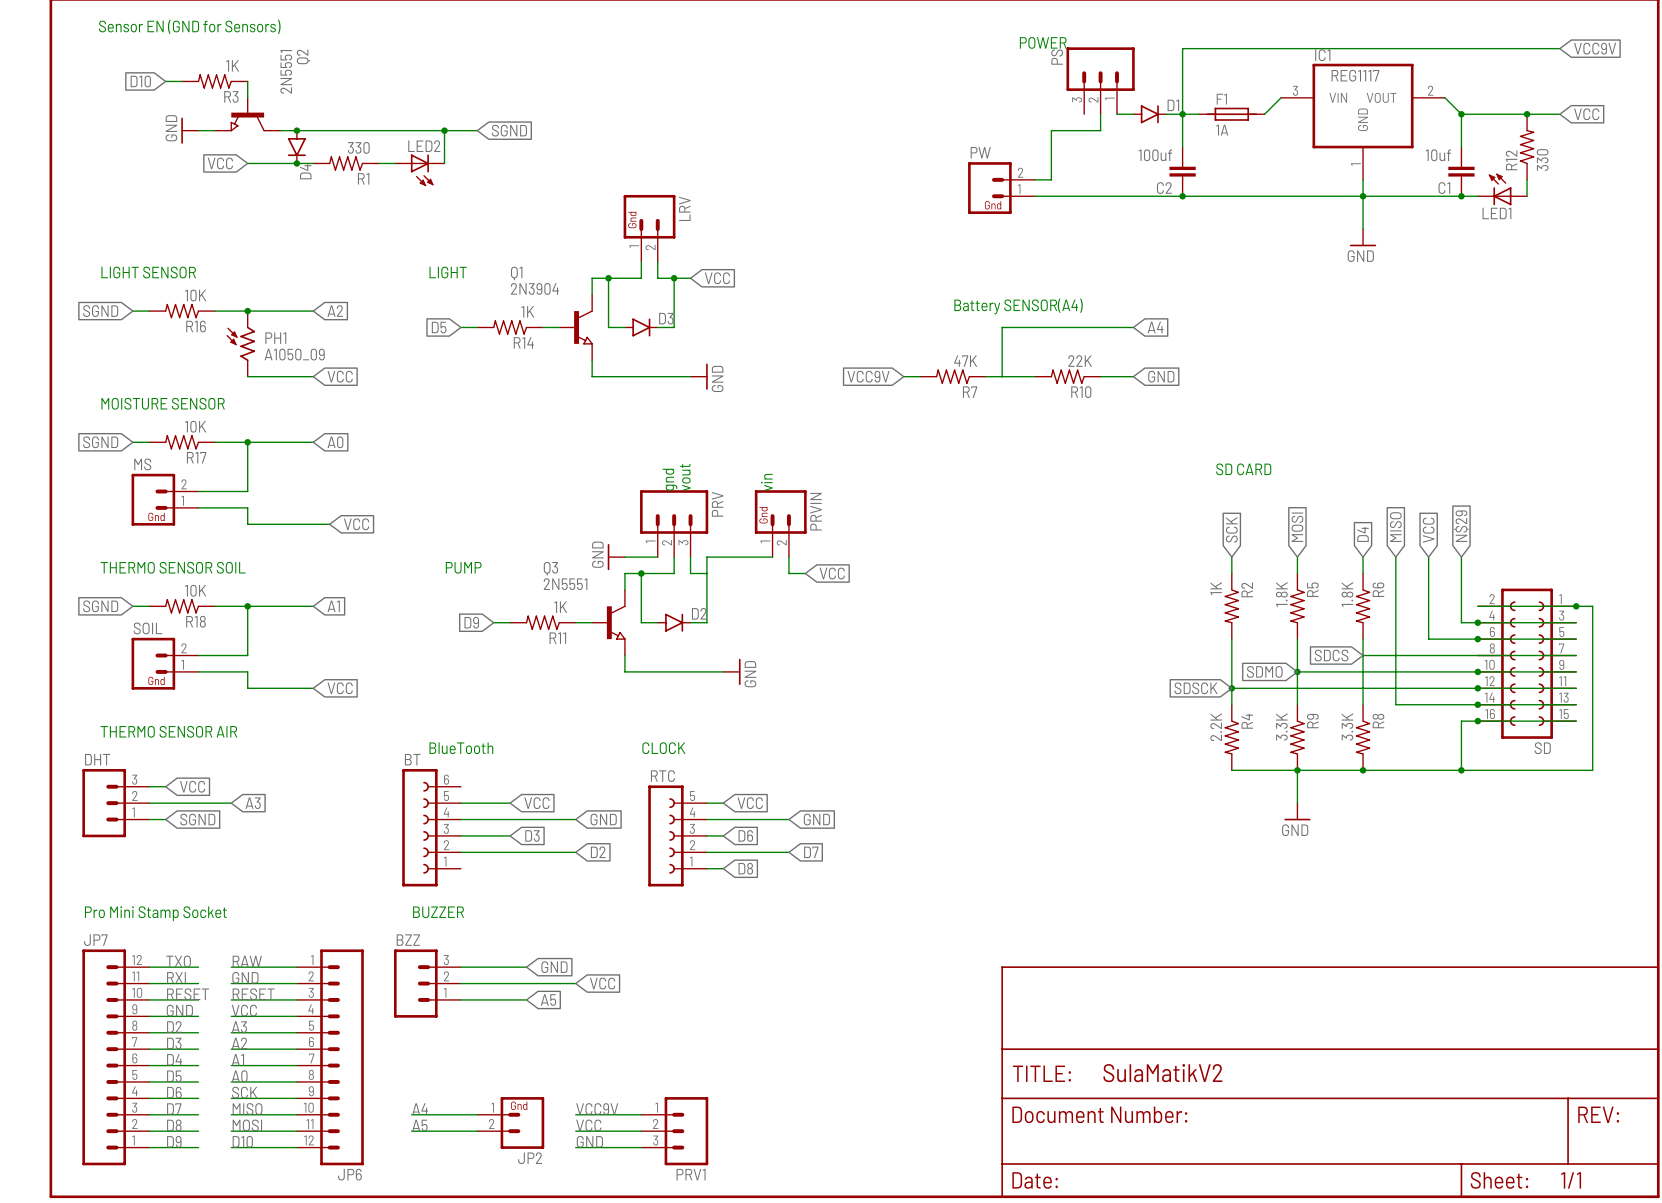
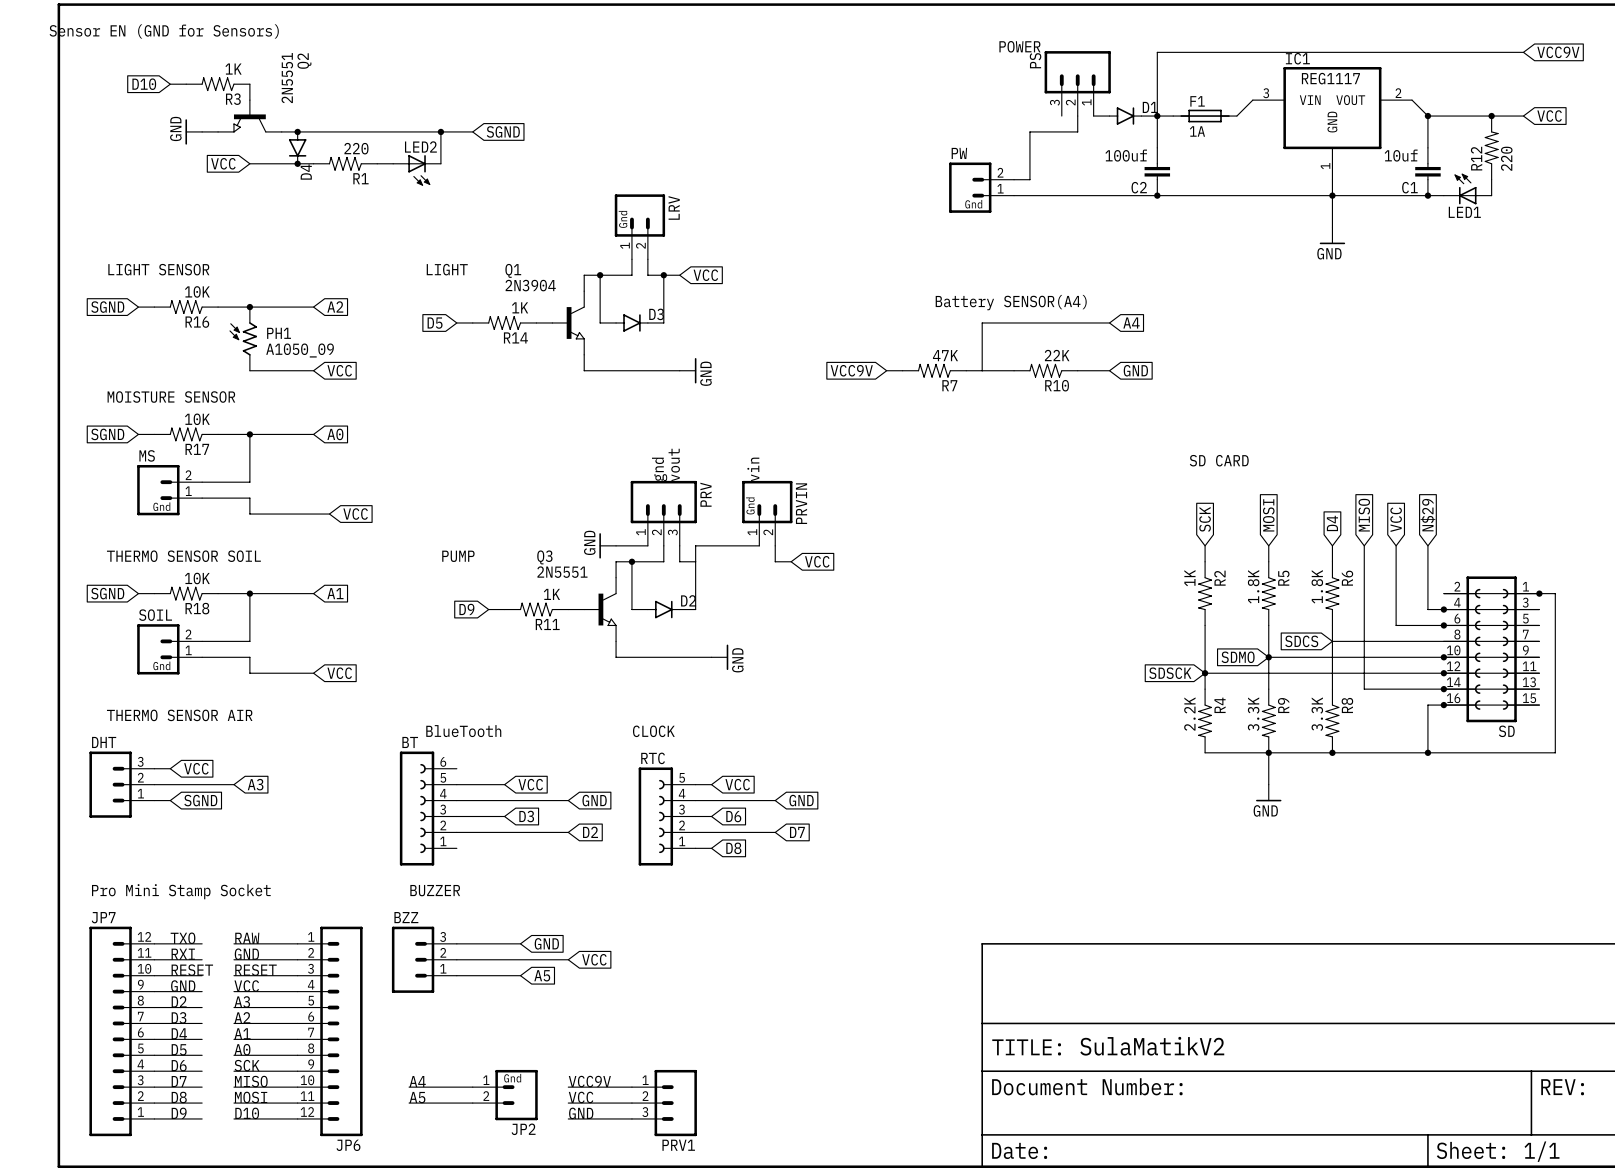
R1 value: 330 (358, 147) -> 220 (356, 148)
R12 value: 330 (1542, 160) -> 220 (1506, 158)

